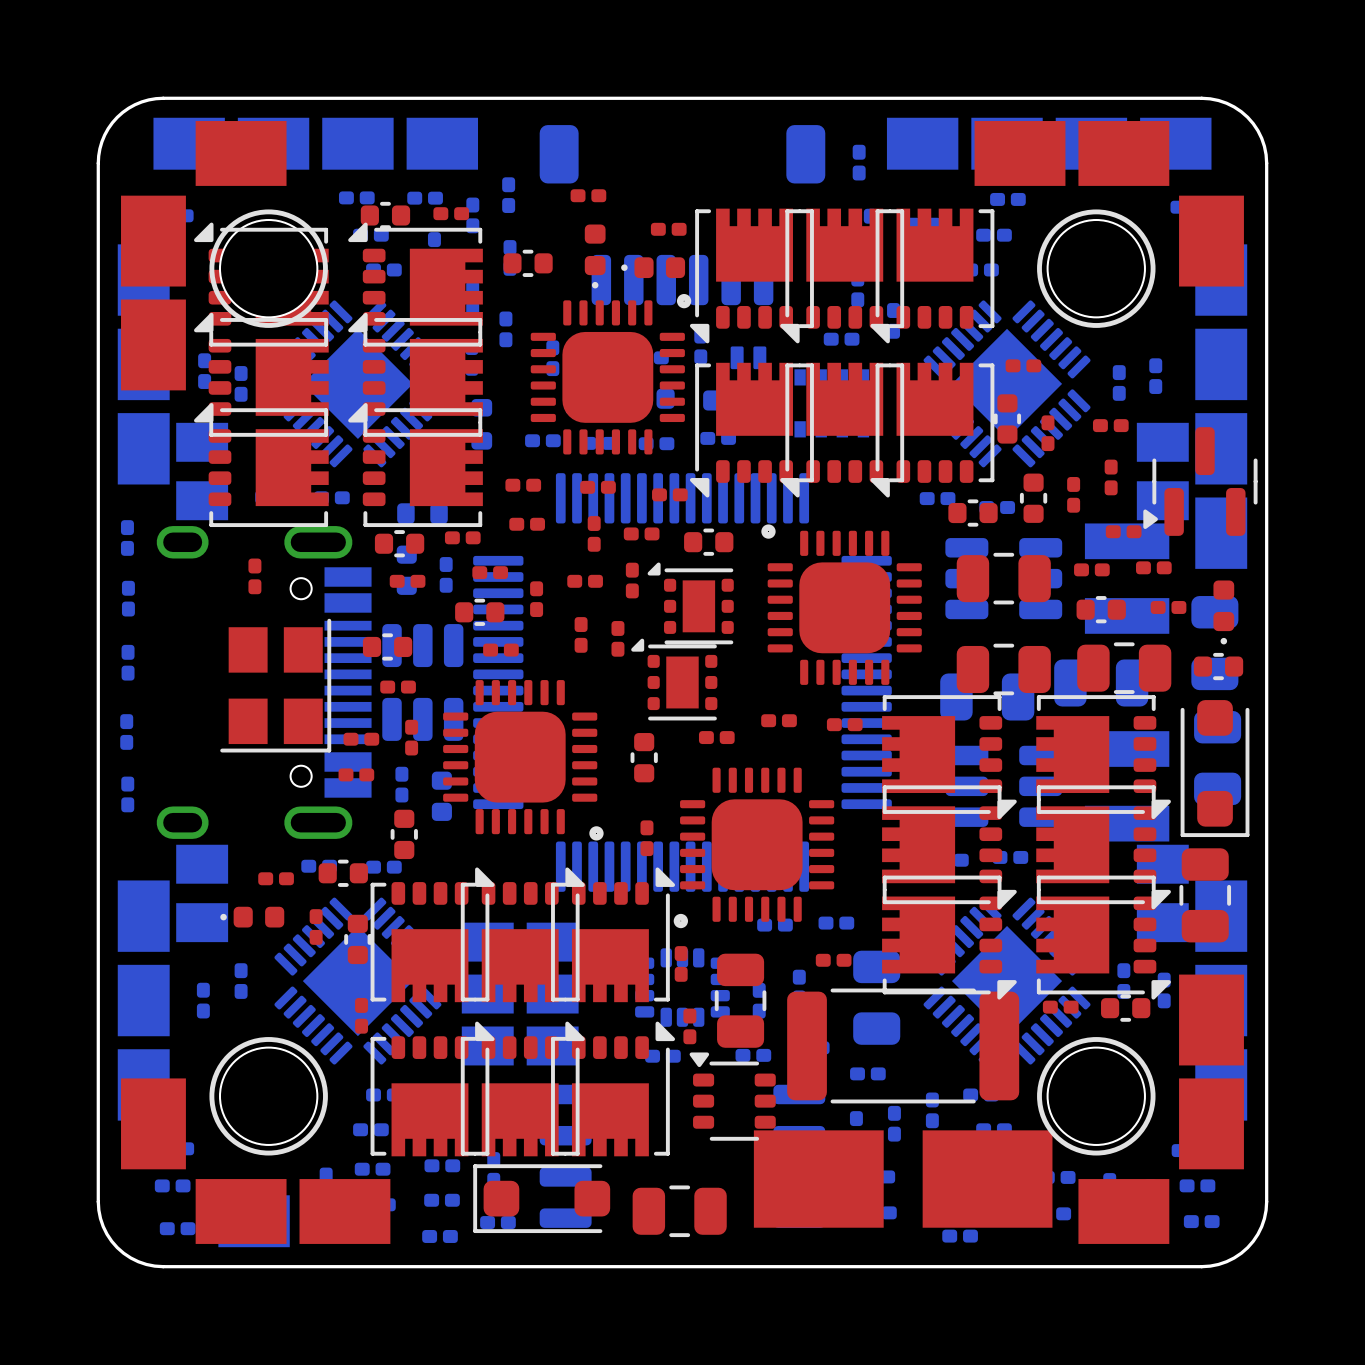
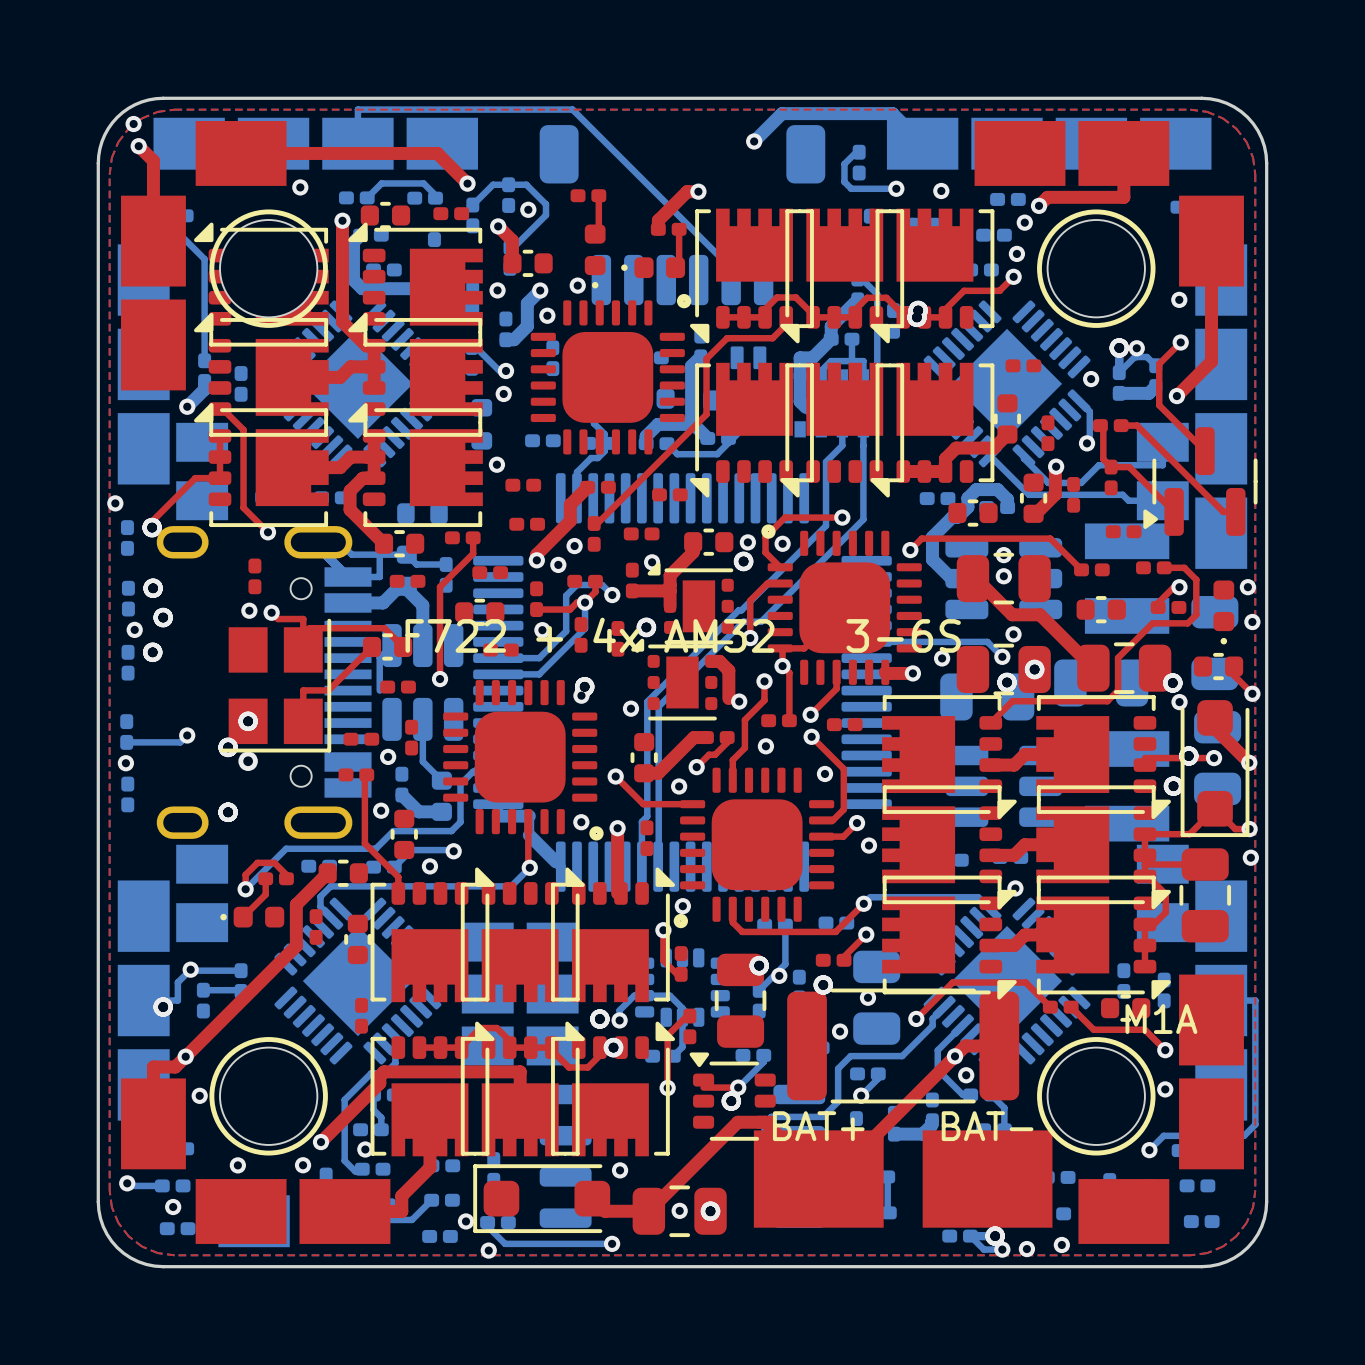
top zone outline: none -> (174, 109) (157, 111) (142, 118) (128, 128) (118, 142) (111, 157) (109, 174) (109, 1190) (111, 1207) (118, 1222) (128, 1236) (142, 1246) (157, 1253) (174, 1255) (1190, 1255) (1207, 1253) (1222, 1246) (1236, 1236) (1246, 1222) (1253, 1207) (1255, 1190) (1255, 174) (1253, 157) (1246, 142) (1236, 128) (1222, 118) (1207, 111) (1190, 109) (174, 109)
via: none -> (133, 124)
bottom track: none -> (754, 141) (782, 113) (892, 113) (922, 143)
via: none -> (754, 141)
bottom track: none -> (357, 143) (357, 109) (572, 109) (731, 268) (731, 280)
top track: none -> (138, 146) (153, 160) (153, 241)
via: none -> (138, 146)
bottom track: none -> (859, 152) (856, 152) (844, 164) (844, 181) (851, 188) (896, 188)
top track: none -> (241, 153) (437, 153) (467, 183)
top track: none -> (1123, 153) (1123, 197) (1047, 197) (1039, 205)
via: none -> (467, 183)
via: none -> (300, 187)
via: none -> (896, 188)
via: none -> (941, 190)
top track: none -> (698, 191) (687, 191) (658, 220) (658, 229)
via: none -> (698, 191)
top track: none -> (598, 195) (598, 230) (595, 234)
bottom track: none -> (367, 197) (381, 183) (423, 183) (435, 195) (435, 198)
bottom track: none -> (472, 205) (493, 184) (526, 184) (546, 204) (546, 215) (513, 247) (510, 247)
via: none -> (1039, 205)
via: none -> (528, 209)
bottom track: none -> (165, 215) (165, 219) (204, 259) (204, 360)
top track: none -> (342, 220) (342, 322) (366, 345) (374, 345) (374, 387)
via: none -> (342, 220)
via: none -> (1024, 222)
top track: none -> (498, 226) (512, 240) (512, 263)
via: none -> (498, 226)
top track: none -> (679, 229) (679, 264) (675, 267)
bottom track: none -> (360, 235) (353, 242) (353, 279) (362, 288) (412, 288) (433, 309) (472, 309)
top track: none -> (1211, 241) (1211, 361) (1176, 396)
via: none -> (1016, 253)
top track: none -> (1013, 276) (999, 290) (964, 290) (945, 309) (945, 317) (903, 317) (903, 314) (886, 297) (867, 297) (855, 309) (855, 317) (813, 317) (813, 314) (795, 297) (777, 297) (765, 309) (765, 317) (722, 317)
via: none -> (1013, 276)
bottom track: none -> (857, 279) (861, 279) (877, 294) (877, 429) (863, 429) (863, 519) (761, 621) (743, 621) (658, 706) (658, 866)
via: none -> (577, 285)
via: none -> (497, 290)
bottom track: none -> (540, 290) (527, 303) (527, 326) (513, 339) (505, 339)
via: none -> (540, 290)
bottom track: none -> (857, 299) (831, 326) (831, 339) (812, 357) (800, 357) (800, 401) (819, 419) (821, 429)
via: none -> (1179, 299)
via: none -> (918, 310)
via: none -> (547, 315)
top track: none -> (786, 317) (786, 324) (772, 338) (727, 338) (706, 358) (706, 414) (597, 523) (594, 523)
via: none -> (916, 317)
bottom track: none -> (851, 339) (851, 361)
top track: none -> (1180, 342) (1159, 363) (1159, 405) (1204, 451)
via: none -> (1180, 342)
bottom track: none -> (471, 347) (476, 347) (501, 373)
bottom track: none -> (1119, 347) (1119, 372) (1134, 357) (1147, 357) (1155, 365)
via: none -> (1119, 347)
via: none -> (1136, 348)
bottom track: none -> (700, 356) (691, 366) (691, 424)
top track: none -> (374, 366) (350, 366) (340, 377) (283, 377)
via: none -> (506, 370)
bottom track: none -> (821, 377) (821, 370) (830, 361) (863, 361) (863, 377)
via: none -> (1091, 379)
bottom track: none -> (204, 381) (204, 389) (187, 406)
bottom track: none -> (1155, 386) (1148, 393) (1119, 393)
via: none -> (503, 393)
via: none -> (1176, 396)
bottom track: none -> (743, 400) (743, 428) (733, 438) (728, 438) (728, 442) (717, 454) (677, 454) (666, 443)
bottom track: none -> (1079, 400) (1089, 411) (1089, 440) (1087, 443)
via: none -> (187, 406)
bottom track: none -> (593, 407) (593, 423) (604, 434) (604, 451) (597, 458) (591, 458) (577, 472) (577, 498)
top track: none -> (219, 409) (222, 409) (243, 429) (243, 507) (267, 532)
top track: none -> (1100, 425) (1103, 428) (1103, 459) (1111, 467) (1129, 467) (1174, 511)
top track: none -> (1121, 425) (1137, 425) (1223, 511) (1235, 511)
bottom track: none -> (842, 429) (842, 445) (826, 461) (826, 525) (647, 701) (647, 816) (641, 821) (641, 866)
top track: none -> (1007, 434) (993, 448) (956, 448) (945, 458) (945, 471) (903, 471)
top track: none -> (219, 435) (219, 478) (195, 478) (151, 522)
top track: none -> (374, 435) (374, 478) (362, 478) (350, 491) (350, 509) (383, 543)
bottom track: none -> (707, 438) (693, 424) (657, 424) (646, 436) (646, 443)
bottom track: none -> (1162, 442) (1162, 465) (1098, 465) (1081, 482) (1048, 482) (1023, 458) (1023, 455)
via: none -> (1087, 443)
bottom track: none -> (990, 455) (1029, 494) (1122, 494) (1128, 500) (1162, 500)
top track: none -> (374, 457) (350, 457) (340, 467) (283, 467)
via: none -> (496, 464)
top track: none -> (1056, 466) (1055, 494) (1035, 513) (1033, 513)
via: none -> (1056, 466)
top track: none -> (587, 487) (570, 504) (570, 521) (536, 554) (536, 560)
via: none -> (115, 503)
bottom track: none -> (1007, 507) (1007, 499) (997, 489) (976, 489) (967, 498) (967, 507) (958, 517) (952, 517) (932, 537) (932, 559) (951, 578) (966, 578)
top track: none -> (842, 517) (785, 517) (765, 537) (765, 552) (780, 567)
via: none -> (842, 517)
via: none -> (152, 527)
via: none -> (267, 532)
top track: none -> (473, 537) (473, 553) (440, 586) (440, 679)
bottom track: none -> (318, 542) (339, 542) (351, 554) (406, 554) (416, 564) (446, 564)
top track: none -> (693, 542) (693, 552) (670, 575) (670, 606)
via: none -> (747, 542)
via: none -> (782, 543)
via: none -> (574, 546)
bottom track: none -> (319, 548) (348, 577) (379, 577) (379, 554)
top track: none -> (910, 550) (921, 538) (1050, 538) (1081, 569)
via: none -> (910, 550)
via: none -> (1003, 555)
via: none -> (536, 560)
via: none -> (743, 561)
via: none -> (652, 562)
via: none -> (558, 564)
top track: none -> (1164, 567) (1184, 567) (1196, 579) (1196, 614) (1187, 623) (1152, 623) (1118, 657) (1118, 690) (1107, 701) (1012, 701) (990, 722)
via: none -> (1003, 576)
top track: none -> (972, 578) (975, 578) (1012, 614) (1040, 614) (1093, 668)
top track: none -> (595, 581) (595, 591) (584, 602) (577, 602) (570, 609) (536, 609)
top track: none -> (780, 583) (767, 583) (750, 600) (750, 638)
top track: none -> (1179, 587) (1173, 587) (1158, 602) (1158, 607)
via: none -> (1179, 587)
via: none -> (1247, 587)
via: none -> (153, 588)
bottom track: none -> (406, 589) (396, 589) (382, 602) (348, 602)
bottom track: none -> (406, 589) (422, 605) (422, 645)
top track: none -> (632, 590) (670, 590)
bottom track: none -> (612, 595) (602, 585) (576, 585) (566, 595) (566, 631) (539, 658) (498, 658)
via: none -> (612, 595)
bottom track: none -> (585, 602) (585, 628) (539, 674) (498, 674)
via: none -> (585, 602)
top track: none -> (844, 607) (804, 648) (780, 648) (782, 650) (782, 666) (789, 672) (789, 720)
via: none -> (249, 610)
top track: none -> (271, 612) (277, 619) (303, 619) (303, 649)
via: none -> (271, 612)
via: none -> (163, 617)
via: none -> (1252, 622)
via: none -> (646, 627)
via: none -> (134, 629)
via: none -> (542, 630)
top track: none -> (303, 634) (309, 628) (384, 628) (403, 646)
via: none -> (1013, 634)
text: none -> F722 + 4x AM32 3-6S (683, 635)
via: none -> (750, 638)
bottom track: none -> (866, 641) (987, 641) (1002, 656)
bottom track: none -> (392, 645) (379, 657) (379, 690)
top track: none -> (372, 646) (328, 690) (303, 690) (303, 721)
via: none -> (152, 652)
via: none -> (1002, 656)
via: none -> (942, 658)
top track: none -> (711, 661) (719, 661) (728, 670) (728, 698)
via: none -> (782, 666)
top track: none -> (1234, 666) (1234, 675) (1252, 693)
via: none -> (1034, 669)
top track: none -> (836, 672) (836, 688) (810, 714)
top track: none -> (885, 672) (912, 673)
via: none -> (912, 673)
via: none -> (440, 679)
top track: none -> (764, 681) (764, 700) (744, 719) (744, 748) (732, 760) (732, 780)
via: none -> (764, 681)
via: none -> (1007, 682)
via: none -> (1172, 683)
via: none -> (584, 686)
via: none -> (1252, 693)
via: none -> (581, 695)
via: none -> (739, 701)
via: none -> (1179, 702)
via: none -> (630, 708)
via: none -> (810, 714)
top track: none -> (1215, 717) (1215, 728) (1249, 762)
bottom track: none -> (422, 719) (422, 761) (441, 780)
via: none -> (248, 721)
bottom track: none -> (187, 735) (180, 742) (126, 742)
via: none -> (187, 735)
top track: none -> (811, 736) (843, 768) (843, 809) (832, 820) (821, 820)
via: none -> (811, 736)
top track: none -> (706, 737) (693, 737) (658, 773) (644, 773)
top track: none -> (727, 737) (727, 742) (715, 754) (709, 754) (696, 767)
via: none -> (765, 746)
via: none -> (228, 747)
top track: none -> (1081, 754) (1024, 754) (1014, 765) (990, 765)
via: none -> (388, 756)
via: none -> (1188, 756)
top track: none -> (1144, 758) (1214, 758)
via: none -> (1214, 758)
via: none -> (248, 761)
via: none -> (1249, 762)
via: none -> (125, 763)
via: none -> (696, 767)
bottom track: none -> (498, 771) (473, 771) (460, 784) (460, 822) (451, 831) (393, 831) (375, 848) (286, 848) (245, 889)
via: none -> (824, 773)
top track: none -> (366, 774) (364, 776) (364, 843) (398, 877) (398, 893)
top track: none -> (615, 776) (643, 804) (692, 804)
via: none -> (615, 776)
via: none -> (679, 786)
via: none -> (1173, 786)
bottom track: none -> (401, 795) (418, 811) (441, 811)
bottom track: none -> (498, 804) (498, 816) (529, 816) (529, 835) (560, 866)
via: none -> (381, 810)
via: none -> (228, 812)
top track: none -> (528, 821) (529, 867)
via: none -> (581, 822)
top track: none -> (857, 823) (843, 836) (821, 836)
via: none -> (857, 823)
top track: none -> (617, 828) (617, 893)
via: none -> (617, 828)
top track: none -> (1249, 829) (1235, 829) (1215, 808) (1189, 834) (1144, 834) (1144, 876) (1147, 876) (1165, 894) (1165, 912) (1153, 924) (1144, 924) (1144, 966)
via: none -> (1249, 829)
top track: none -> (1081, 844) (1024, 844) (1014, 855) (990, 855)
via: none -> (869, 845)
bottom track: none -> (453, 851) (411, 850) (394, 867)
via: none -> (453, 851)
via: none -> (1250, 857)
top track: none -> (1144, 864) (1205, 864)
via: none -> (429, 866)
bottom track: none -> (529, 867) (511, 886) (330, 886) (320, 896) (320, 906) (331, 918)
via: none -> (529, 867)
top track: none -> (327, 873) (296, 904) (296, 946) (175, 1067) (153, 1067) (153, 1123)
top track: none -> (265, 878) (265, 894) (243, 917)
top track: none -> (286, 878) (286, 874) (274, 862) (257, 862) (245, 874) (245, 889)
via: none -> (1015, 888)
via: none -> (245, 889)
top track: none -> (863, 903) (835, 931) (742, 931) (732, 922) (732, 909)
bottom track: none -> (863, 903) (870, 897) (978, 897) (990, 909)
via: none -> (863, 903)
via: none -> (682, 906)
bottom track: none -> (785, 925) (785, 964) (759, 990) (759, 965)
top track: none -> (663, 930) (663, 960) (677, 974) (681, 974)
via: none -> (663, 930)
top track: none -> (866, 934) (844, 956) (844, 960)
via: none -> (866, 934)
top track: none -> (1081, 934) (1024, 934) (1014, 945) (990, 945)
via: none -> (759, 965)
bottom track: none -> (190, 969) (190, 973) (186, 973) (177, 982) (177, 1000) (143, 1000)
via: none -> (190, 969)
bottom track: none -> (190, 970) (241, 970)
via: none -> (779, 975)
via: none -> (823, 984)
bottom track: none -> (203, 990) (241, 991)
via: none -> (867, 997)
bottom track: none -> (1221, 1000) (1255, 1000) (1255, 1124) (1244, 1135) (1163, 1135) (1149, 1150)
via: none -> (163, 1007)
bottom track: none -> (944, 1007) (932, 1018) (932, 1025) (902, 1056) (850, 1056) (838, 1068) (838, 1101) (823, 1116) (771, 1116) (764, 1123) (764, 1147) (773, 1156) (846, 1156) (866, 1176)
top track: none -> (1050, 1007) (1025, 982) (952, 982) (916, 1018)
top track: none -> (1071, 1007) (1093, 1029) (1144, 1029) (1165, 1050)
top track: none -> (689, 1016) (687, 1016) (667, 1035) (667, 1088)
via: none -> (916, 1018)
via: none -> (599, 1019)
text: none -> M1A (1161, 1019)
bottom track: none -> (619, 1020) (619, 1010) (634, 995) (669, 995) (682, 1008) (682, 1047) (673, 1056)
via: none -> (619, 1020)
bottom track: none -> (962, 1025) (937, 1050) (937, 1069) (962, 1094) (970, 1094)
via: none -> (840, 1031)
bottom track: none -> (384, 1043) (395, 1055) (395, 1063) (385, 1073) (371, 1073) (344, 1099) (344, 1160) (355, 1171) (362, 1169)
top track: none -> (999, 1045) (965, 1045) (835, 1175) (818, 1175)
top track: none -> (419, 1047) (461, 1047) (480, 1028) (496, 1028) (509, 1040) (509, 1047) (551, 1047) (551, 1050) (569, 1067) (587, 1067) (599, 1055) (599, 1047)
via: none -> (613, 1047)
via: none -> (1165, 1050)
bottom track: none -> (763, 1055) (763, 1062) (738, 1087)
via: none -> (185, 1056)
via: none -> (954, 1056)
bottom track: none -> (878, 1073) (878, 1078) (861, 1095)
via: none -> (966, 1075)
top track: none -> (703, 1087) (738, 1087)
via: none -> (738, 1087)
via: none -> (667, 1088)
via: none -> (1165, 1089)
bottom track: none -> (373, 1094) (373, 1109) (381, 1117) (381, 1129)
bottom track: none -> (991, 1094) (1004, 1107) (1004, 1129)
via: none -> (199, 1095)
via: none -> (861, 1095)
via: none -> (731, 1101)
top track: none -> (429, 1111) (429, 1167) (401, 1195) (401, 1211) (344, 1211)
top track: none -> (520, 1111) (520, 1071) (384, 1071) (379, 1076) (379, 1083) (321, 1142)
bottom track: none -> (932, 1120) (931, 1125) (922, 1134) (894, 1134)
text: none -> BAT+ (818, 1126)
text: none -> BAT- (987, 1126)
via: none -> (321, 1142)
via: none -> (365, 1149)
via: none -> (1149, 1150)
via: none -> (237, 1165)
via: none -> (303, 1165)
via: none -> (620, 1170)
top track: none -> (818, 1175) (765, 1122) (737, 1122) (648, 1211) (604, 1211) (592, 1198)
bottom track: none -> (887, 1176) (887, 1211) (889, 1212)
bottom track: none -> (127, 1183) (129, 1185) (162, 1185)
via: none -> (127, 1183)
bottom track: none -> (431, 1200) (411, 1219) (378, 1219) (367, 1208) (367, 1204)
via: none -> (173, 1207)
via: none -> (679, 1210)
via: none -> (710, 1211)
via: none -> (466, 1221)
bottom track: none -> (487, 1222) (487, 1226) (505, 1243) (612, 1243)
bottom track: none -> (995, 1236) (970, 1236) (983, 1249) (1002, 1249)
via: none -> (995, 1236)
via: none -> (612, 1243)
via: none -> (1061, 1244)
via: none -> (1002, 1249)
via: none -> (1026, 1249)
via: none -> (488, 1250)

